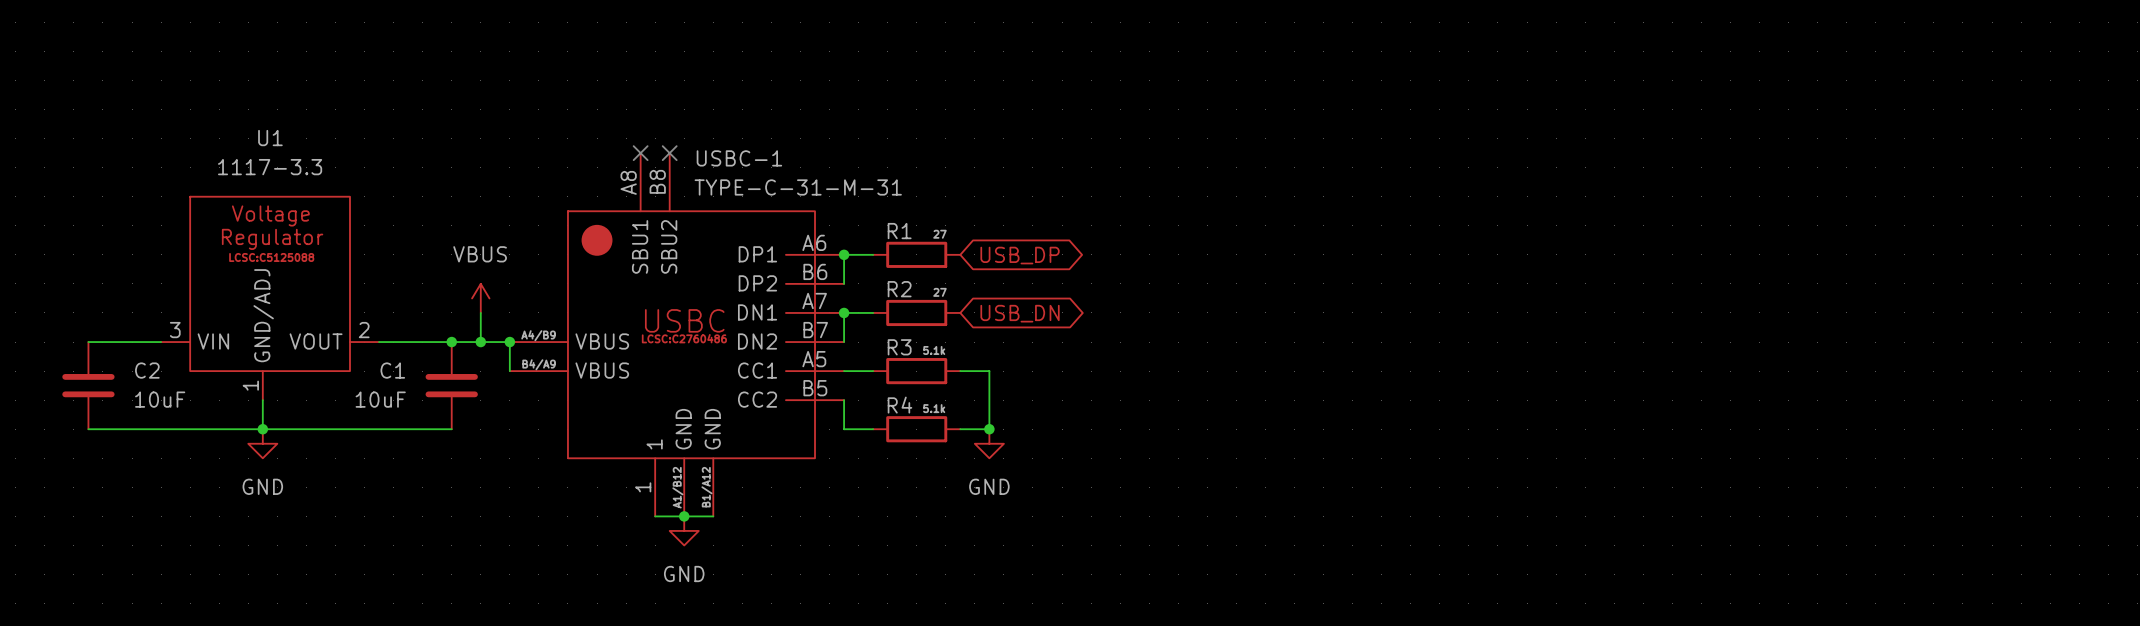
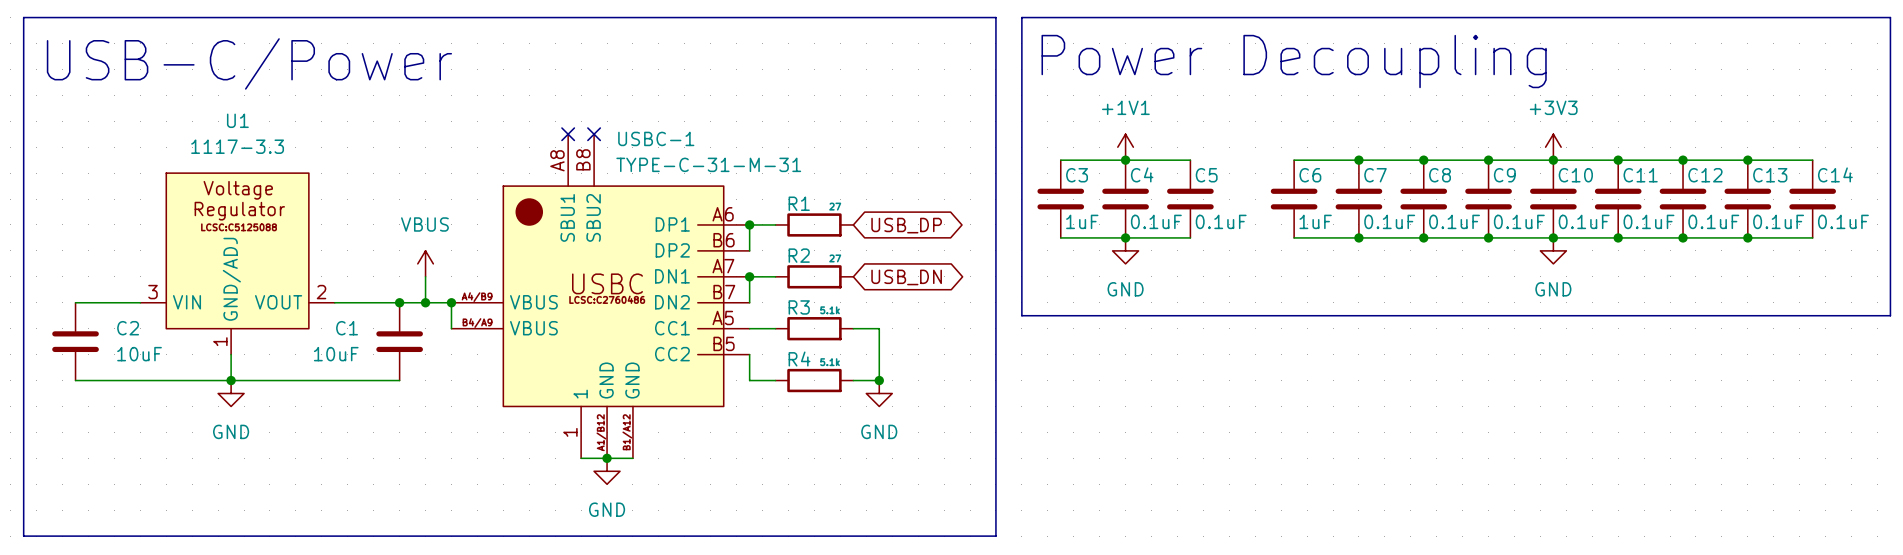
line: none -> (23, 17) (995, 17) (995, 536) (23, 536) (23, 17)
line: none -> (1021, 17) (1890, 17) (1890, 315) (1021, 315) (1021, 17)
text: none -> Power Decoupling (1294, 61)
text: none -> USB-C/Power (249, 63)
power symbol: none -> +1V1 (1125, 147)
power symbol: none -> +3V3 (1553, 147)
wire: none -> (1060, 160) (1190, 160)
junction: none -> (1125, 160)
wire: none -> (1294, 160) (1812, 160)
junction: none -> (1358, 160)
junction: none -> (1423, 160)
junction: none -> (1488, 160)
junction: none -> (1553, 160)
junction: none -> (1618, 160)
junction: none -> (1683, 160)
junction: none -> (1747, 160)
C3: none -> 1uF (1060, 199)
C4: none -> 0.1uF (1125, 199)
C5: none -> 0.1uF (1190, 199)
C6: none -> 1uF (1294, 199)
C7: none -> 0.1uF (1358, 199)
C8: none -> 0.1uF (1423, 199)
C9: none -> 0.1uF (1488, 199)
C10: none -> 0.1uF (1553, 199)
C11: none -> 0.1uF (1618, 199)
C12: none -> 0.1uF (1683, 199)
C13: none -> 0.1uF (1747, 199)
C14: none -> 0.1uF (1812, 199)
wire: none -> (1060, 237) (1190, 237)
junction: none -> (1125, 237)
wire: none -> (1294, 237) (1812, 237)
junction: none -> (1358, 237)
junction: none -> (1423, 237)
junction: none -> (1488, 237)
junction: none -> (1553, 237)
junction: none -> (1618, 237)
junction: none -> (1683, 237)
junction: none -> (1747, 237)
power symbol: none -> GND (1125, 250)
power symbol: none -> GND (1553, 250)

